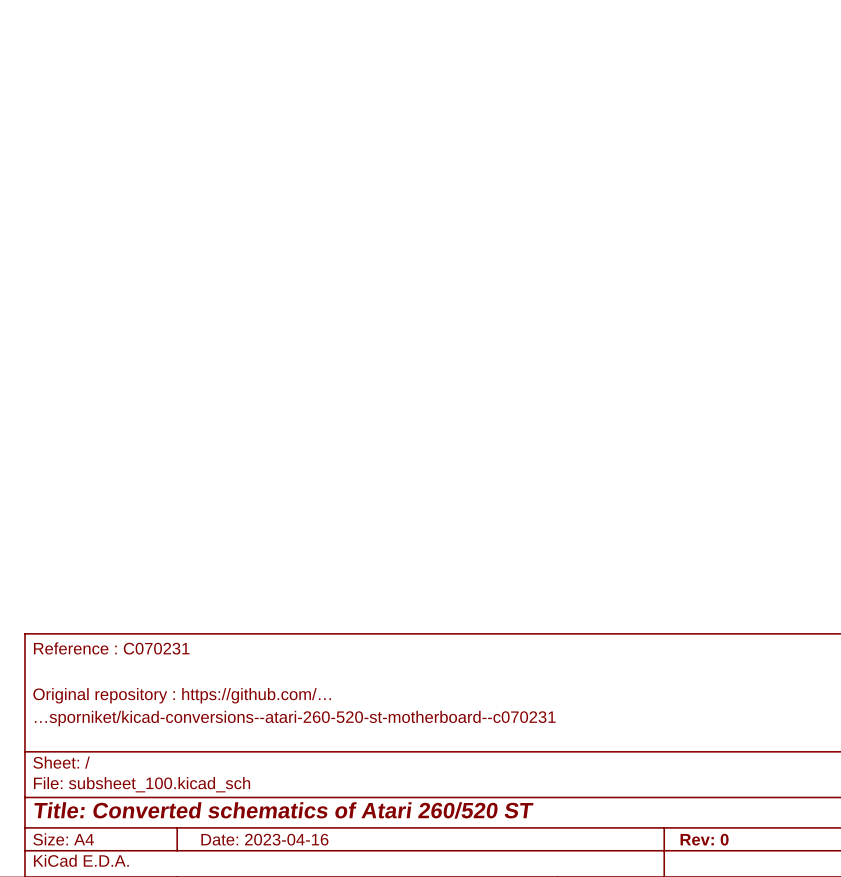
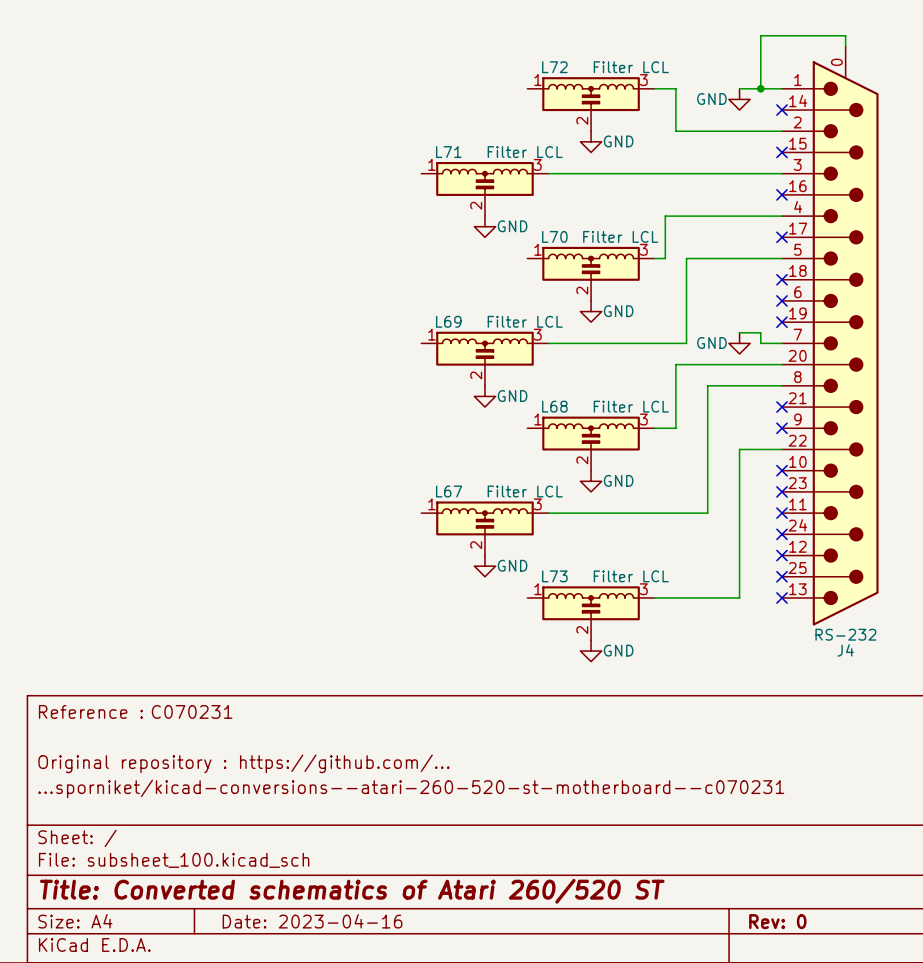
wire: none -> (845, 46) (845, 35) (760, 35) (760, 88)
wire: none -> (654, 88) (675, 88) (675, 131) (781, 131)
wire: none -> (739, 88) (781, 88)
junction: none -> (760, 88)
power symbol: none -> GND (739, 99)
L72: none -> Filter LCL (591, 104)
no-connect mark: none -> (781, 110)
power symbol: none -> GND (591, 141)
no-connect mark: none -> (781, 152)
wire: none -> (548, 173) (781, 173)
L71: none -> Filter LCL (484, 189)
no-connect mark: none -> (781, 194)
wire: none -> (781, 216) (665, 216) (665, 258) (654, 258)
power symbol: none -> GND (484, 226)
no-connect mark: none -> (781, 237)
wire: none -> (781, 258) (686, 258) (686, 343) (548, 343)
L70: none -> Filter LCL (591, 273)
no-connect mark: none -> (781, 279)
no-connect mark: none -> (781, 300)
power symbol: none -> GND (591, 311)
no-connect mark: none -> (781, 322)
wire: none -> (739, 332) (760, 332) (760, 343) (781, 343)
J4: none -> RS-232 (830, 335)
power symbol: none -> GND (739, 343)
L69: none -> Filter LCL (484, 358)
wire: none -> (781, 364) (675, 364) (675, 428) (654, 428)
wire: none -> (781, 385) (707, 385) (707, 513) (548, 513)
power symbol: none -> GND (484, 396)
no-connect mark: none -> (781, 407)
no-connect mark: none -> (781, 428)
L68: none -> Filter LCL (591, 443)
wire: none -> (781, 449) (739, 449) (739, 597) (654, 597)
no-connect mark: none -> (781, 470)
power symbol: none -> GND (591, 481)
no-connect mark: none -> (781, 491)
no-connect mark: none -> (781, 513)
L67: none -> Filter LCL (484, 528)
no-connect mark: none -> (781, 534)
no-connect mark: none -> (781, 555)
power symbol: none -> GND (484, 566)
no-connect mark: none -> (781, 576)
no-connect mark: none -> (781, 597)
L73: none -> Filter LCL (591, 613)
power symbol: none -> GND (591, 651)

